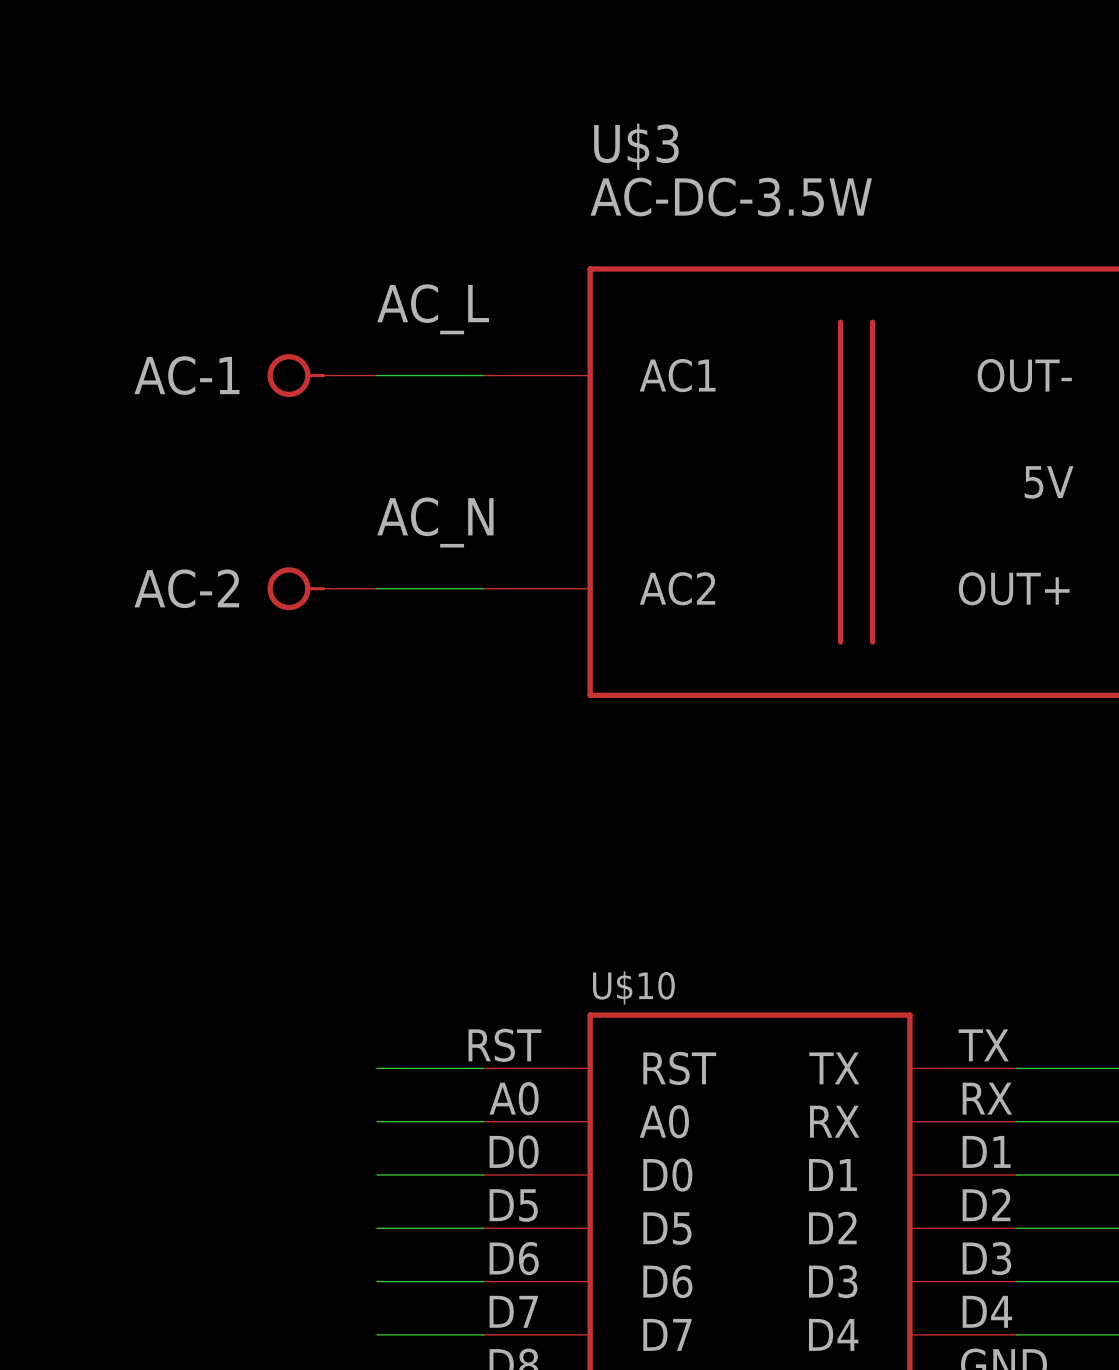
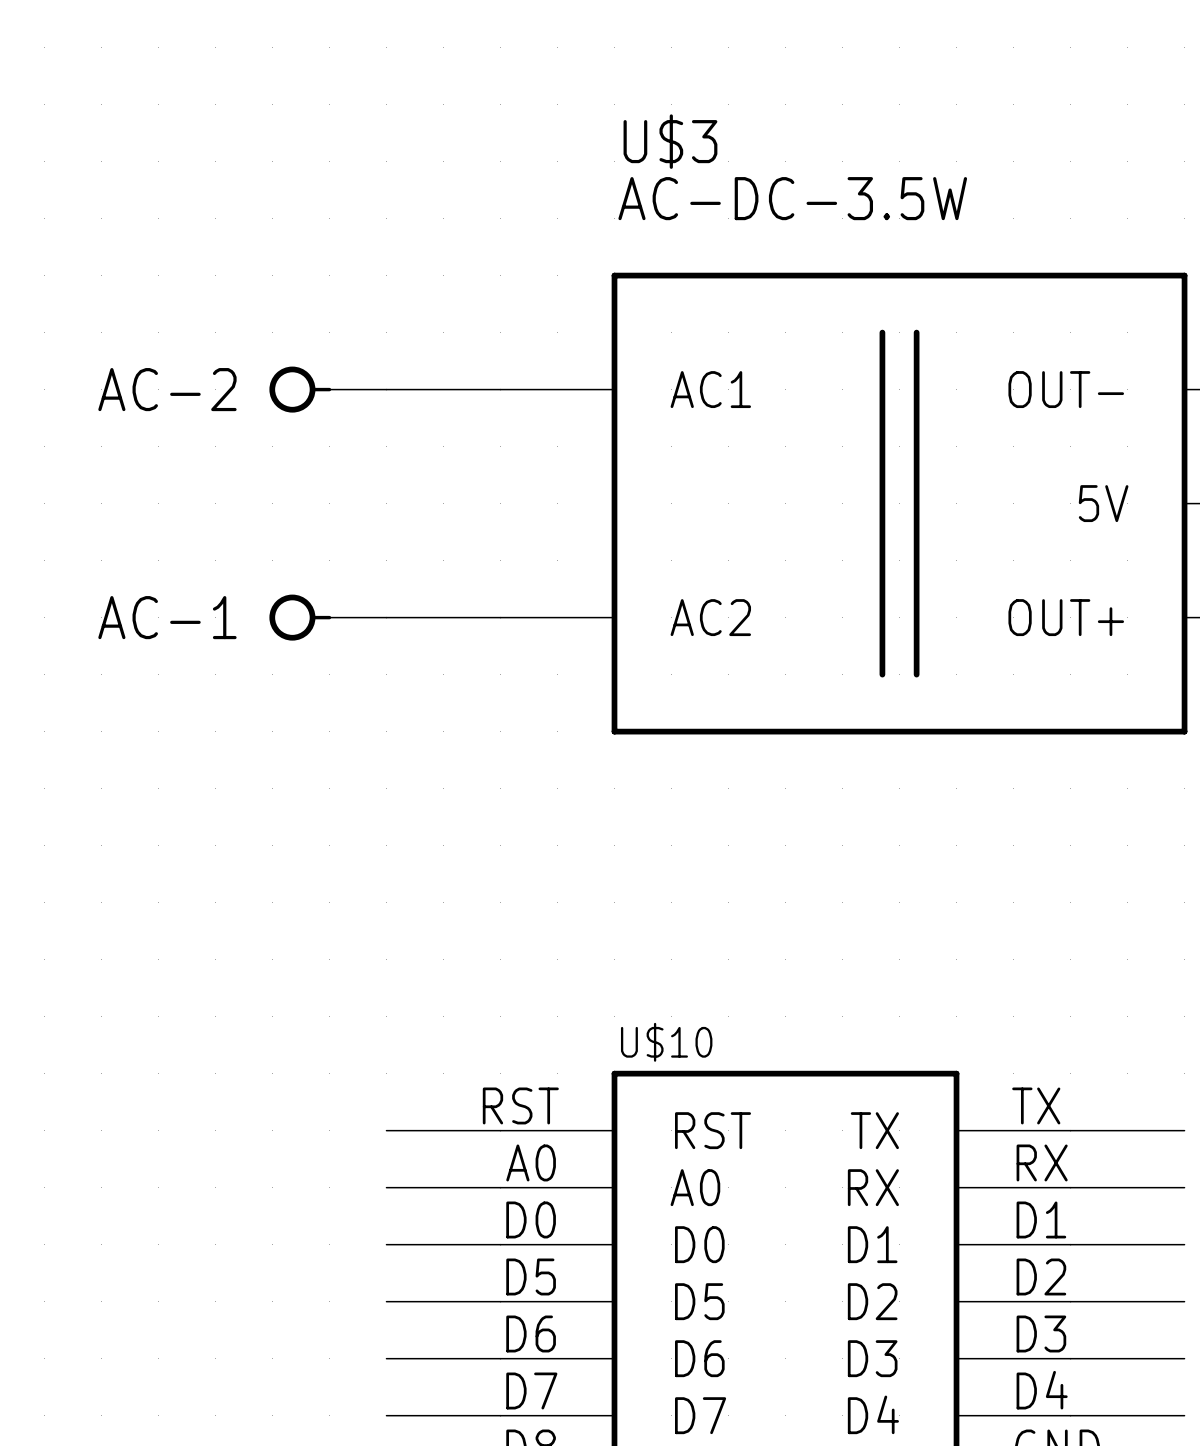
label: AC_L (433, 309) -> none
AC-1 name: AC-1 (186, 375) -> AC-2 (167, 389)
label: AC_N (435, 522) -> none
AC-2 name: AC-2 (186, 588) -> AC-1 (167, 617)

